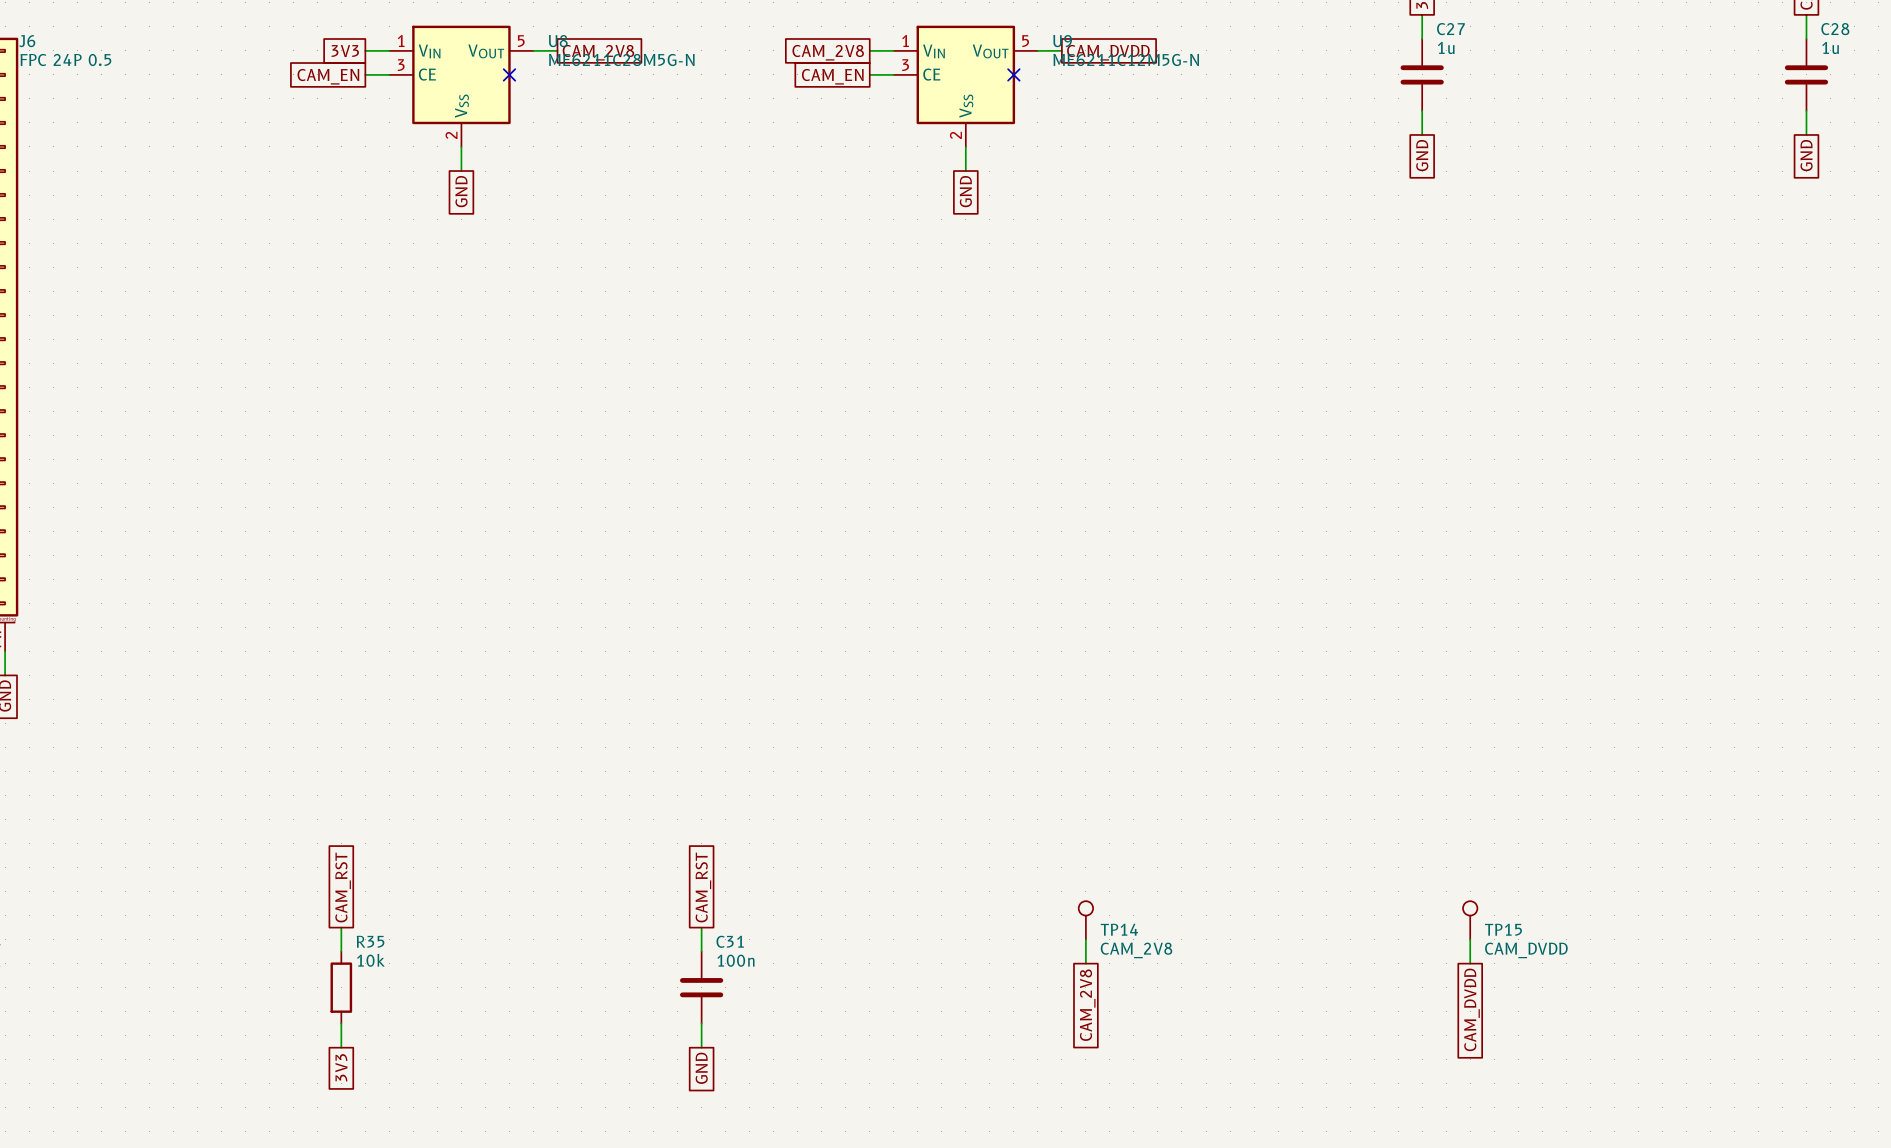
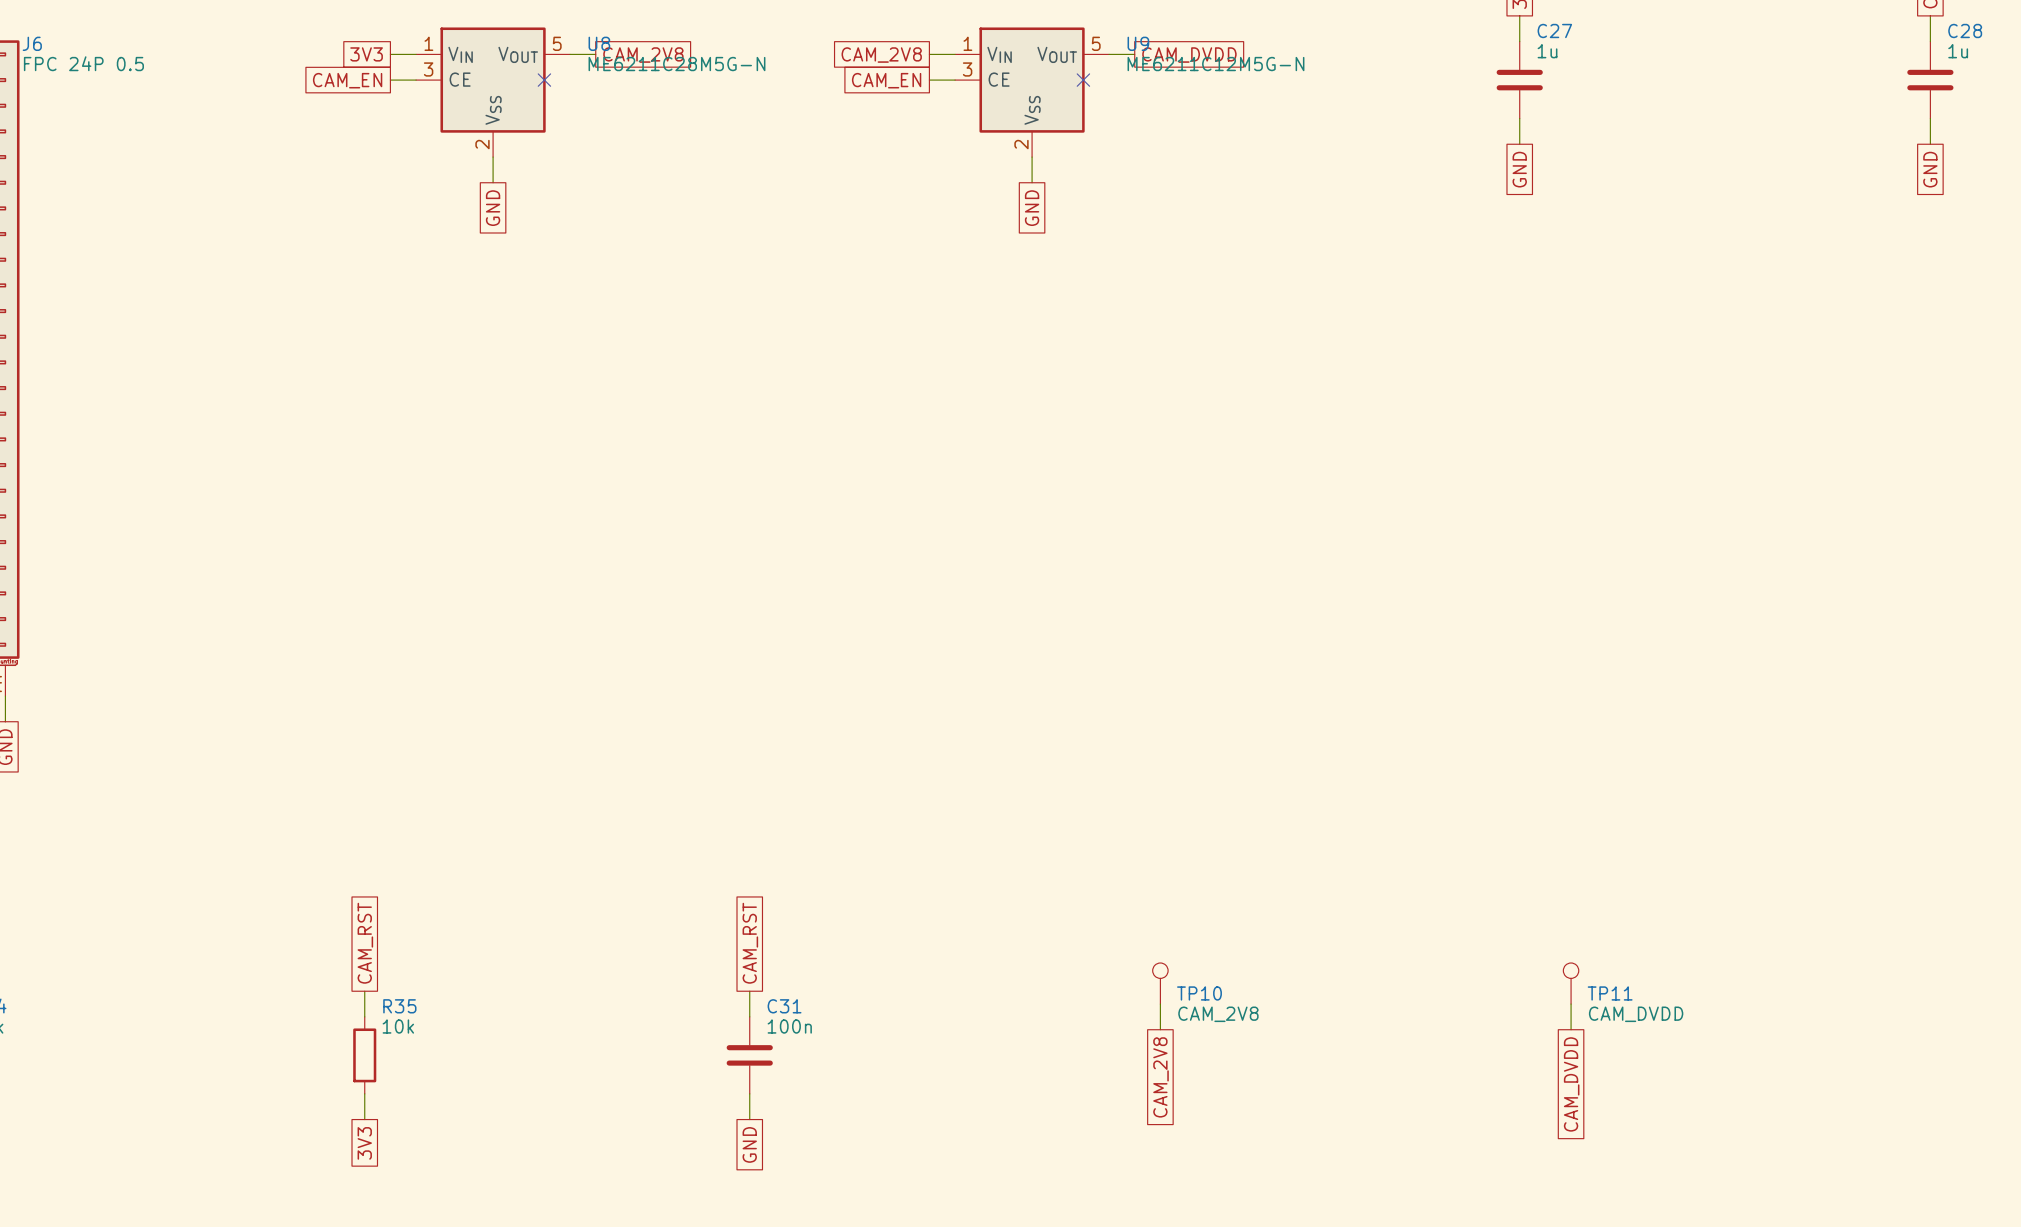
TP14 name: TP14 (1119, 929) -> TP10 (1199, 993)
TP15 name: TP15 (1503, 929) -> TP11 (1610, 993)

